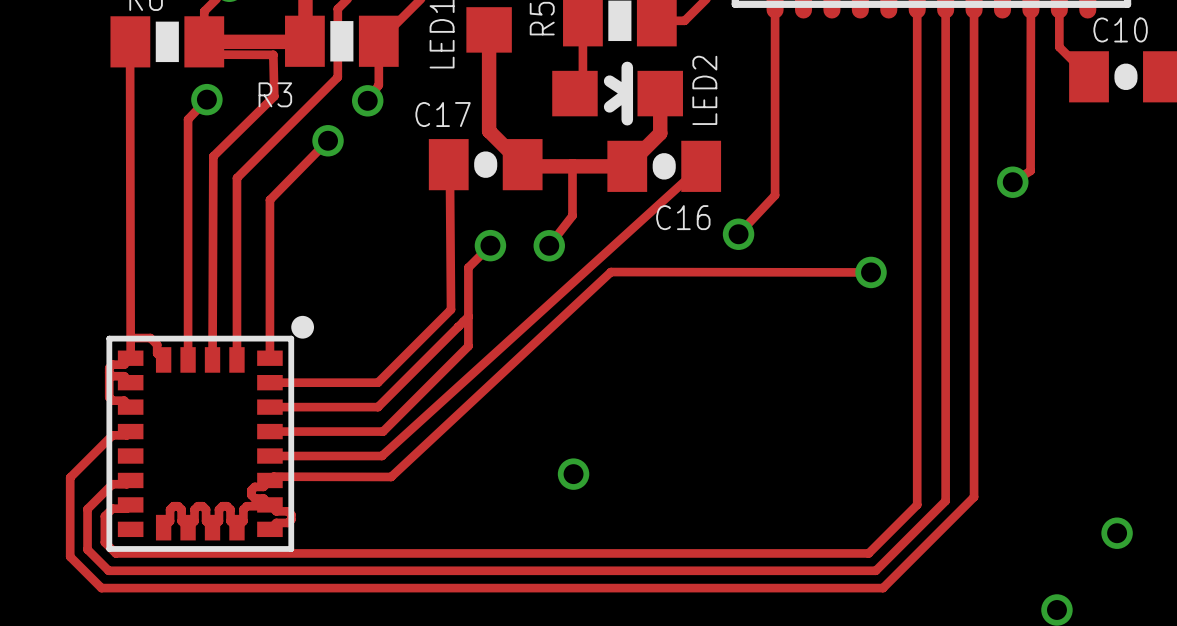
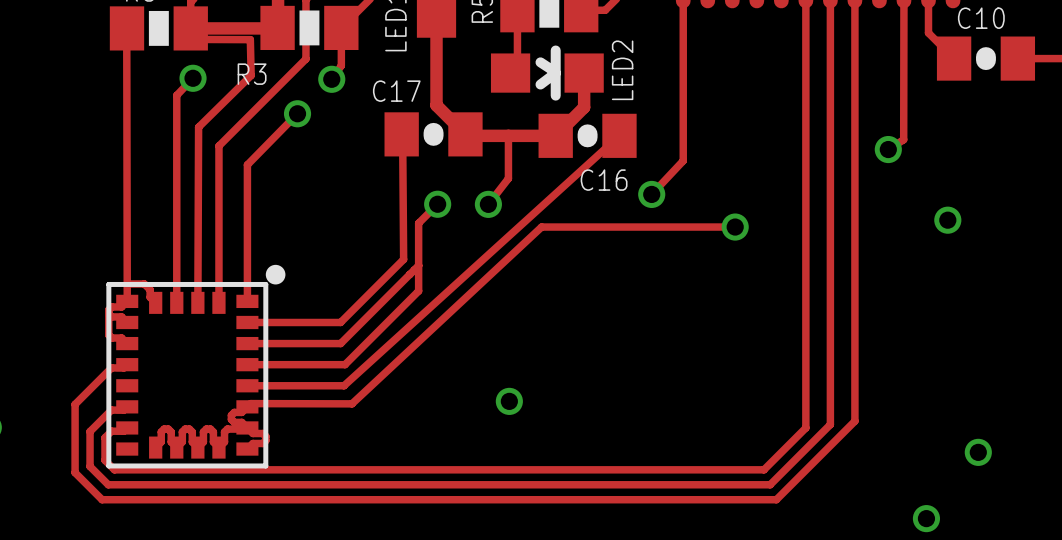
via: none -> (947, 220)
track: (610, 272) (871, 272) -> (541, 227) (735, 227)
via position: (871, 272) -> (735, 227)

